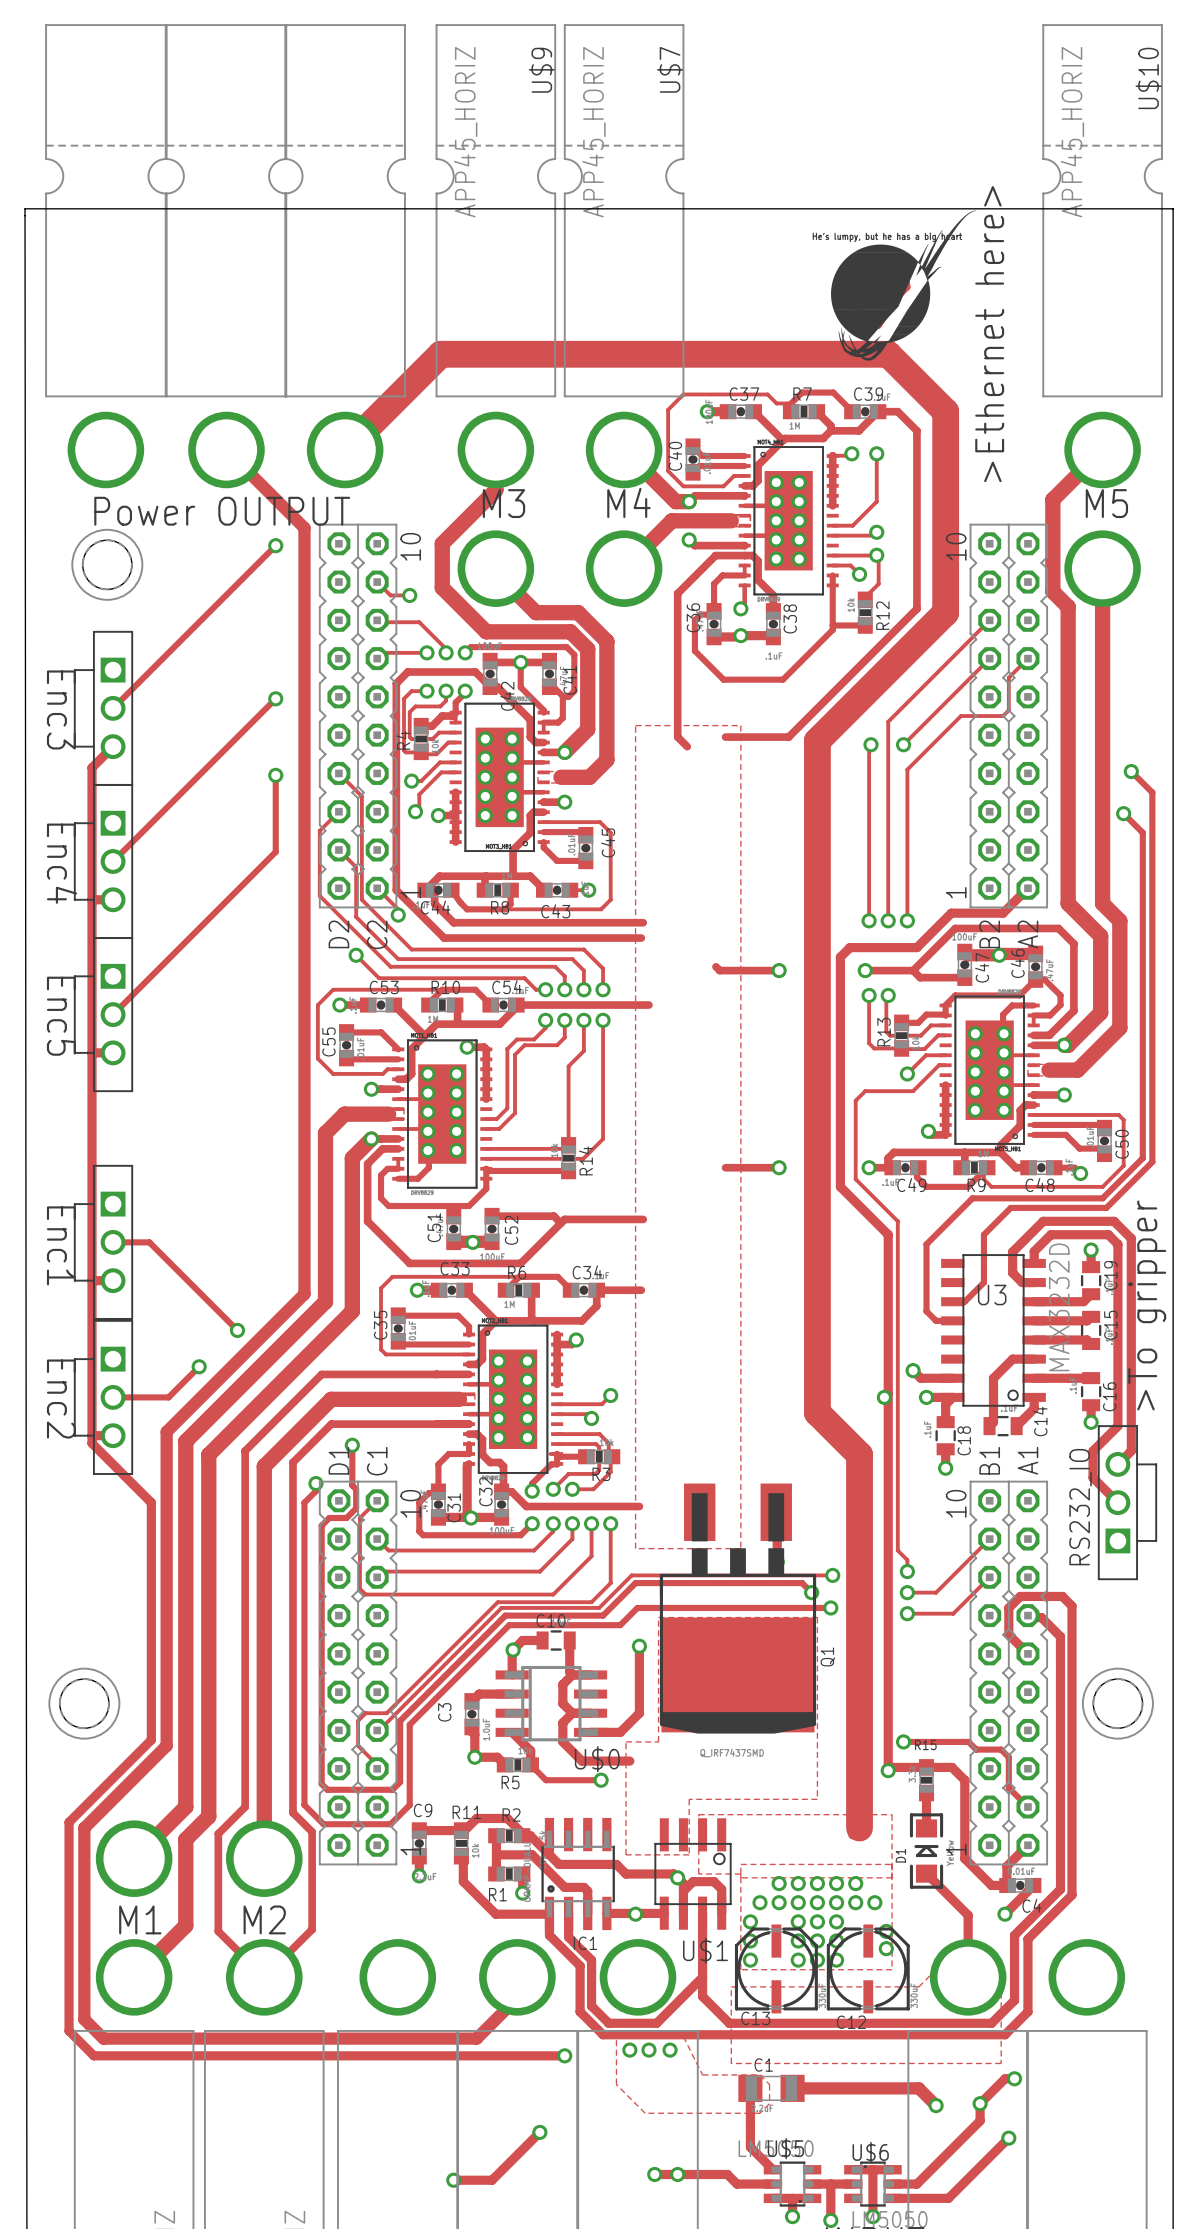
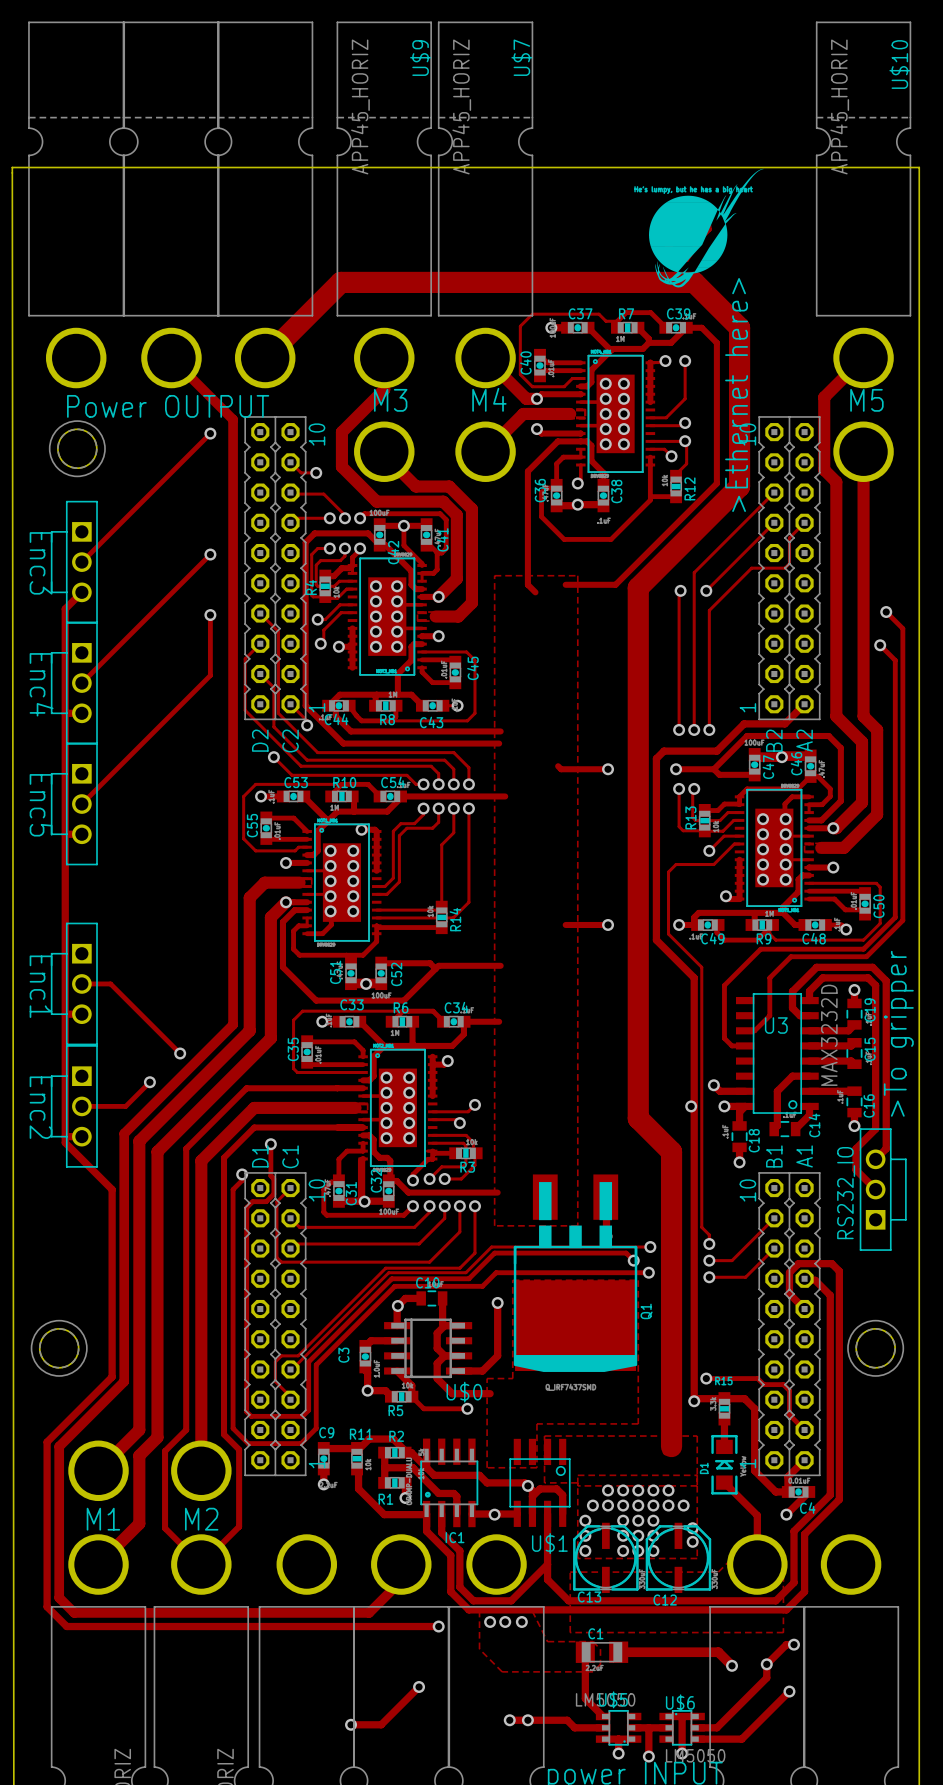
text position: >Ethernet here> (989, 334) -> >Ethernet here> (736, 394)

